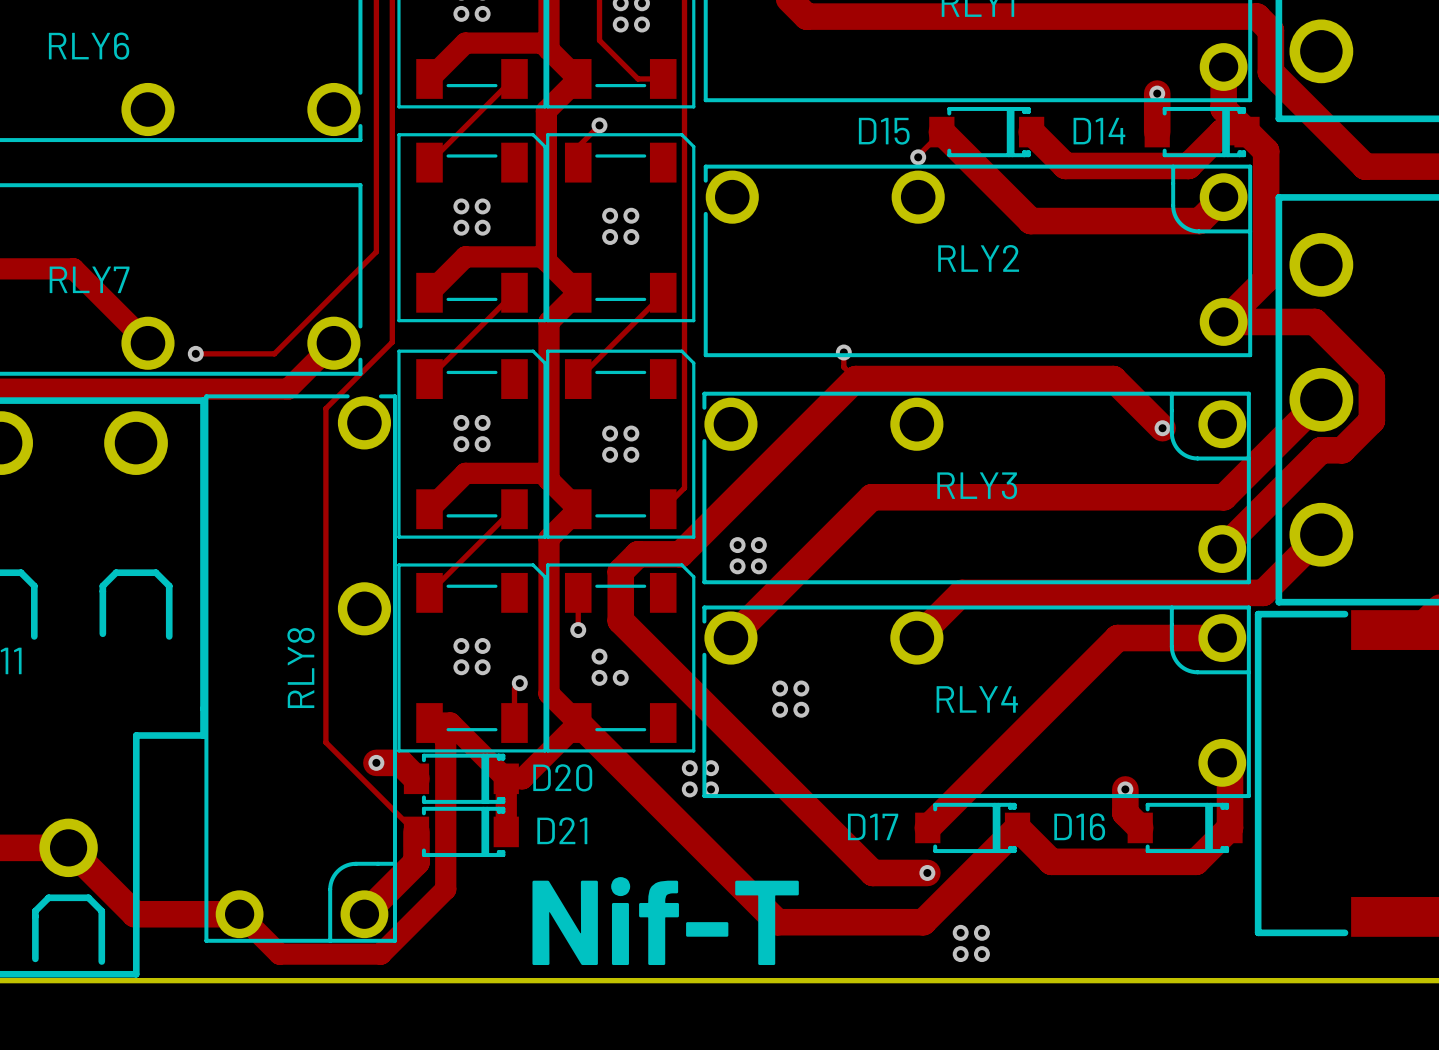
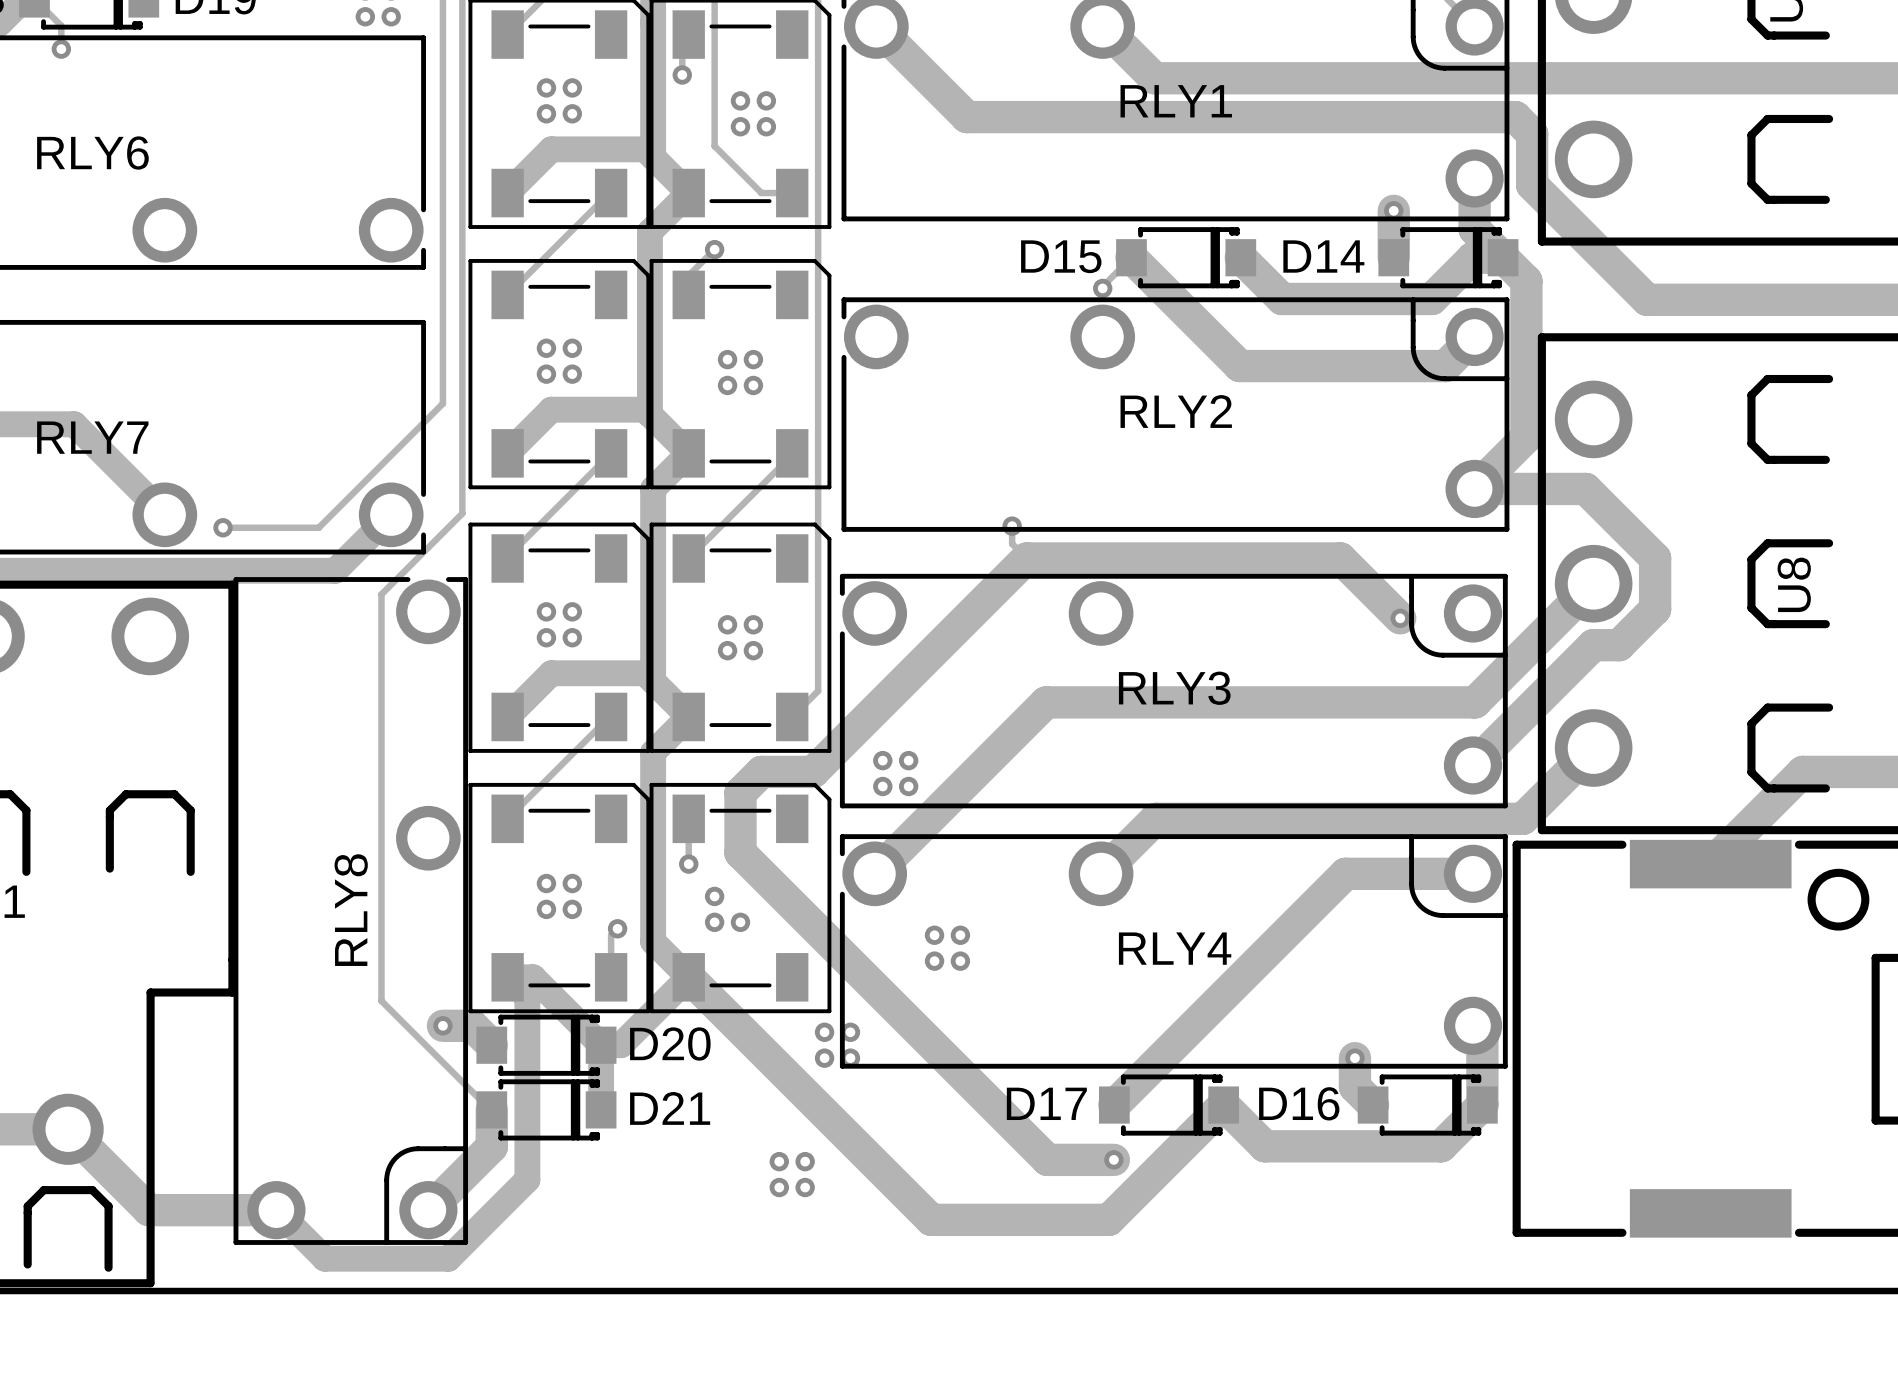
via: none -> (779, 1161)
via: none -> (805, 1161)
via: none -> (779, 1187)
via: none -> (805, 1187)
text: Nif-T (665, 921) -> none
via: (960, 932) -> none
via: (981, 932) -> none
via: (960, 954) -> none
via: (981, 954) -> none

